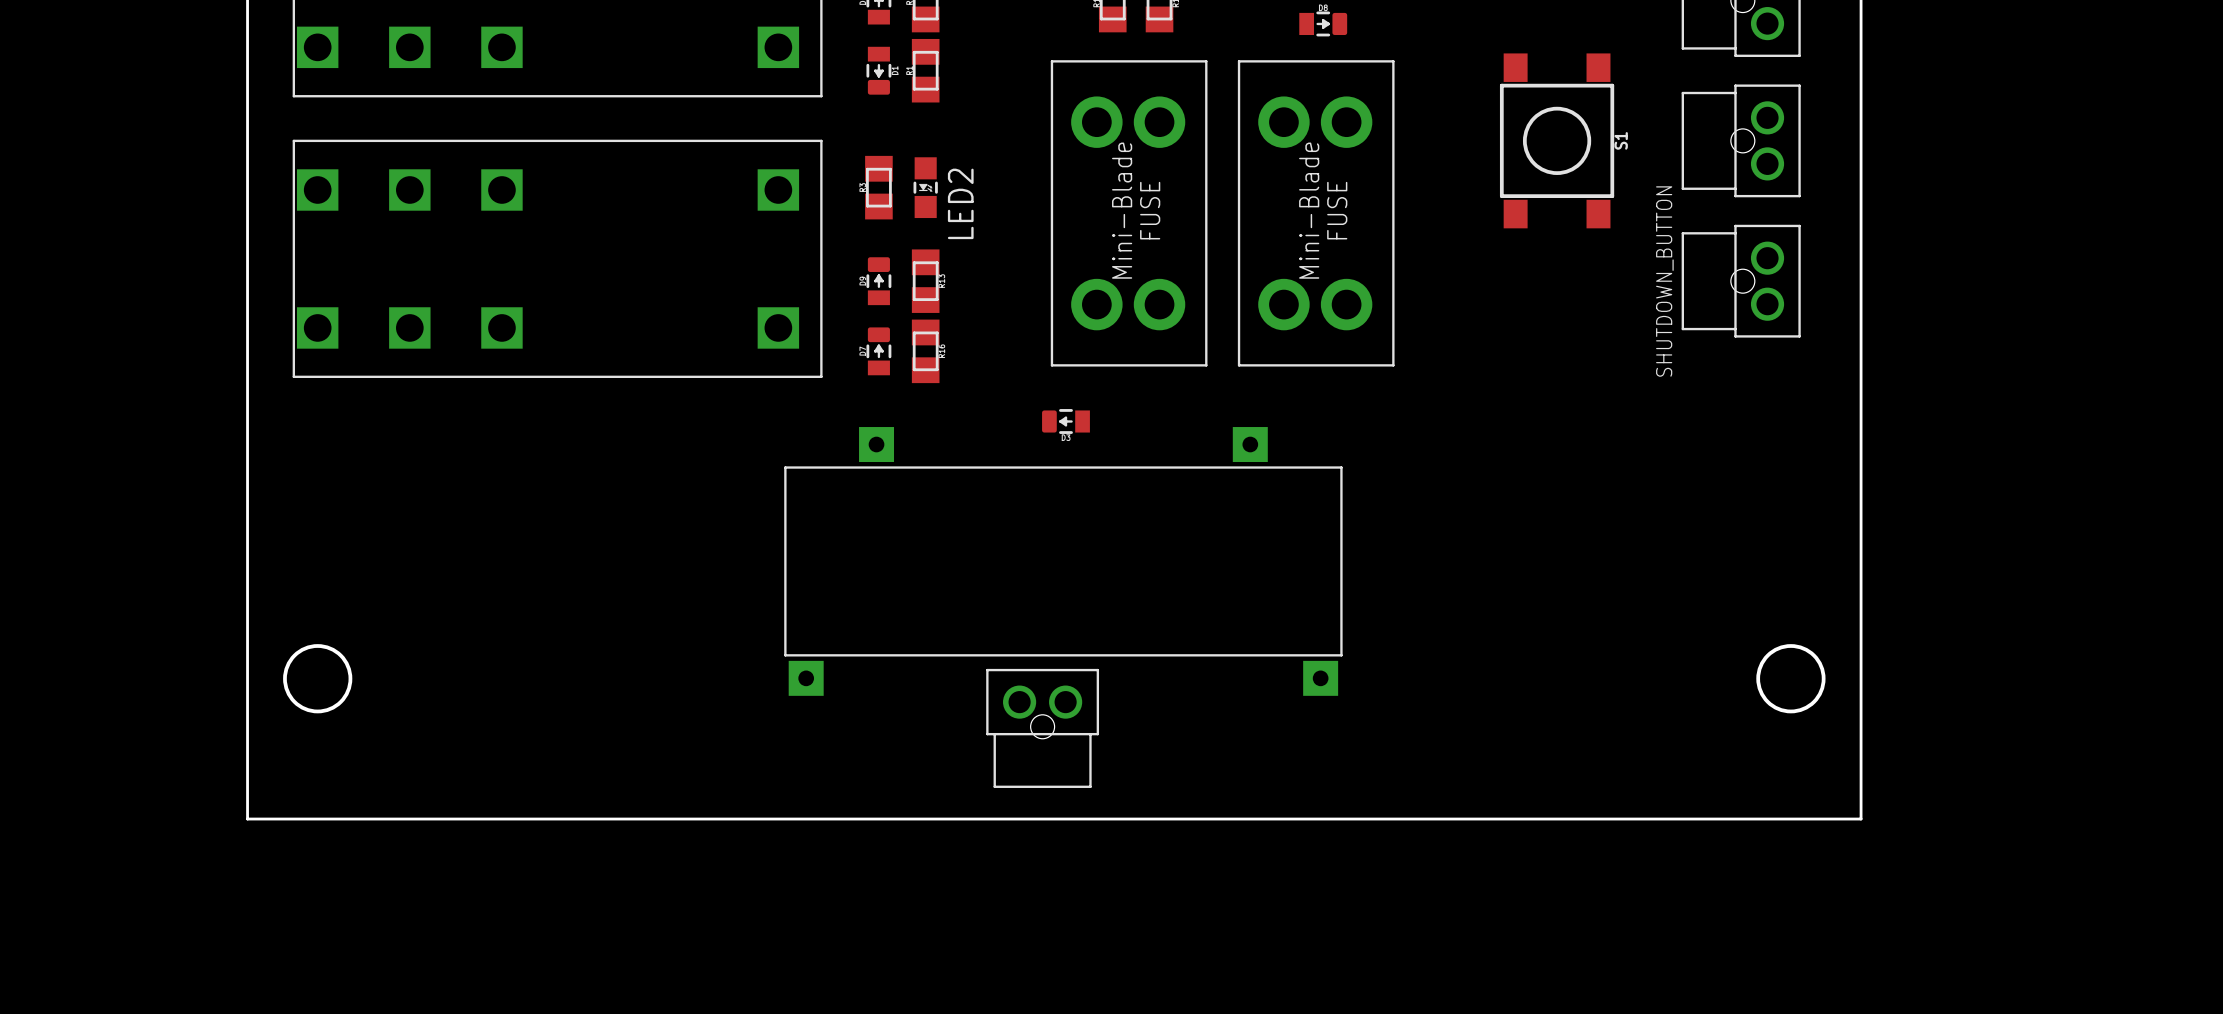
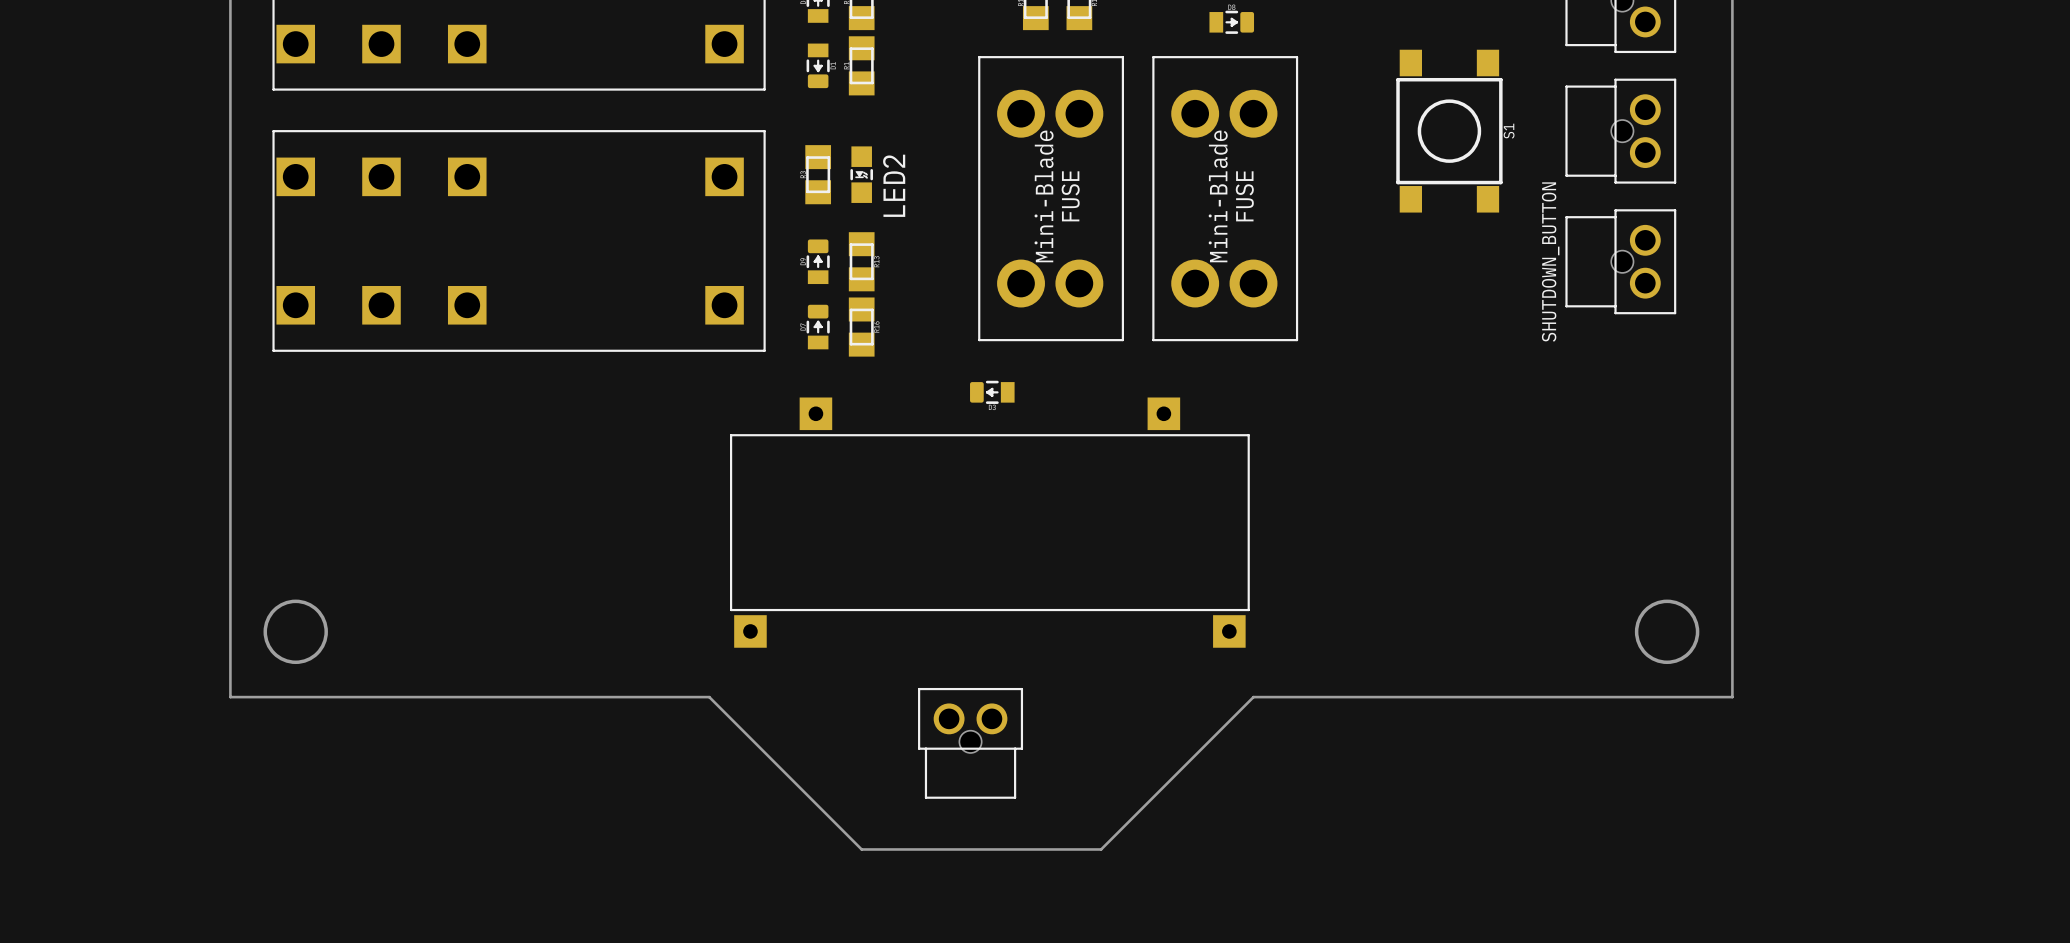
part position: (1042, 728) -> (970, 743)
board edge: (247, 748) (247, 819) (1861, 819) (1861, 748) -> (230, 697) (709, 697) (861, 849) (1101, 849) (1253, 697) (1732, 697)

